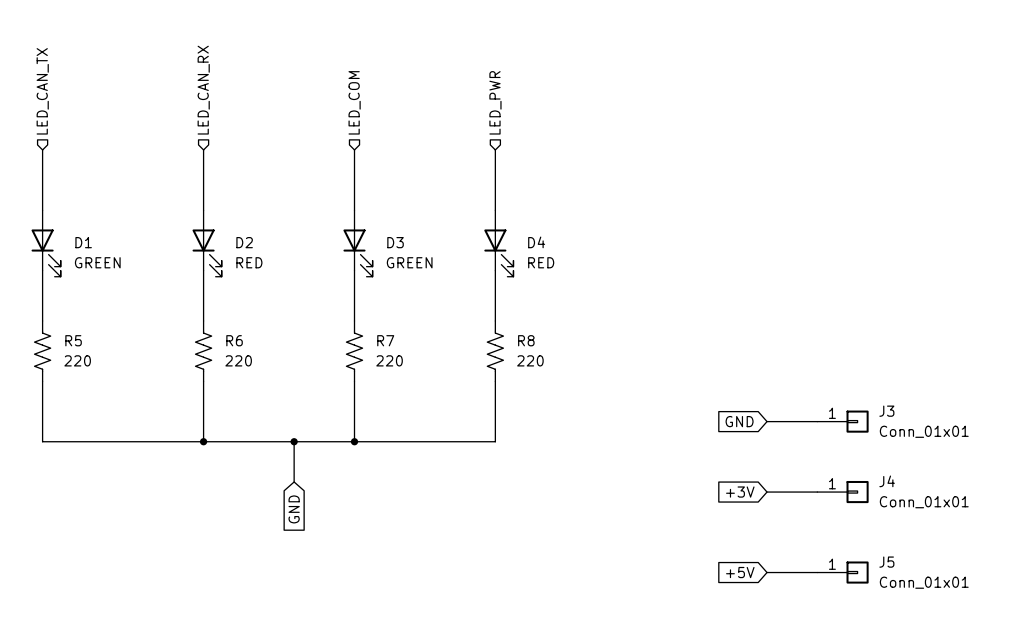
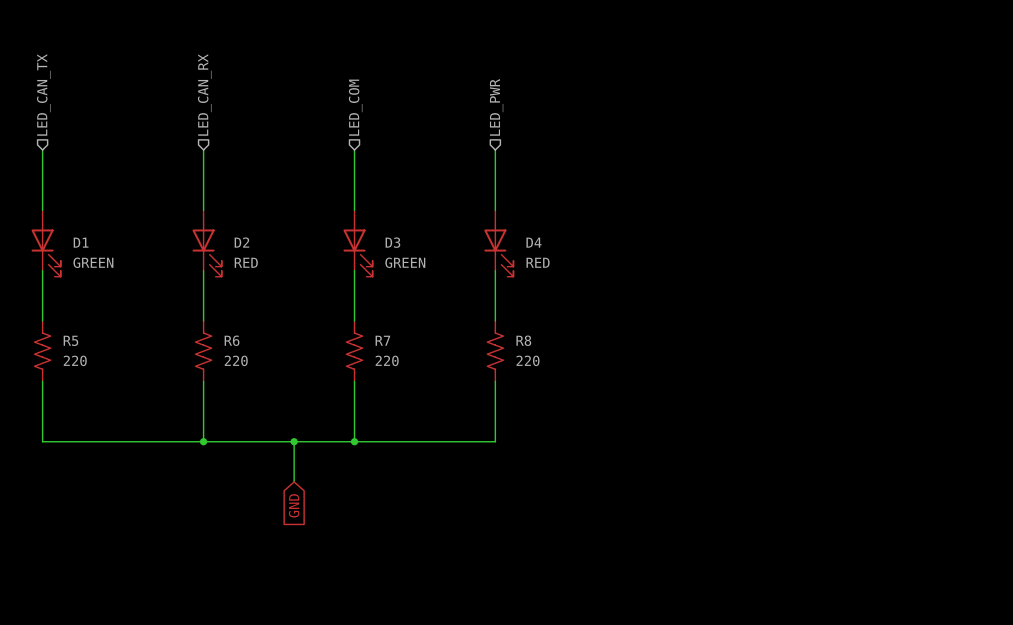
global label: GND (739, 421) -> none
wire: (767, 421) (817, 421) -> none
J3: Conn_01x01 (842, 421) -> none
global label: +3V (740, 492) -> none
wire: (767, 492) (817, 492) -> none
J4: Conn_01x01 (842, 492) -> none
global label: +5V (740, 572) -> none
wire: (767, 572) (817, 572) -> none
J5: Conn_01x01 (842, 572) -> none

